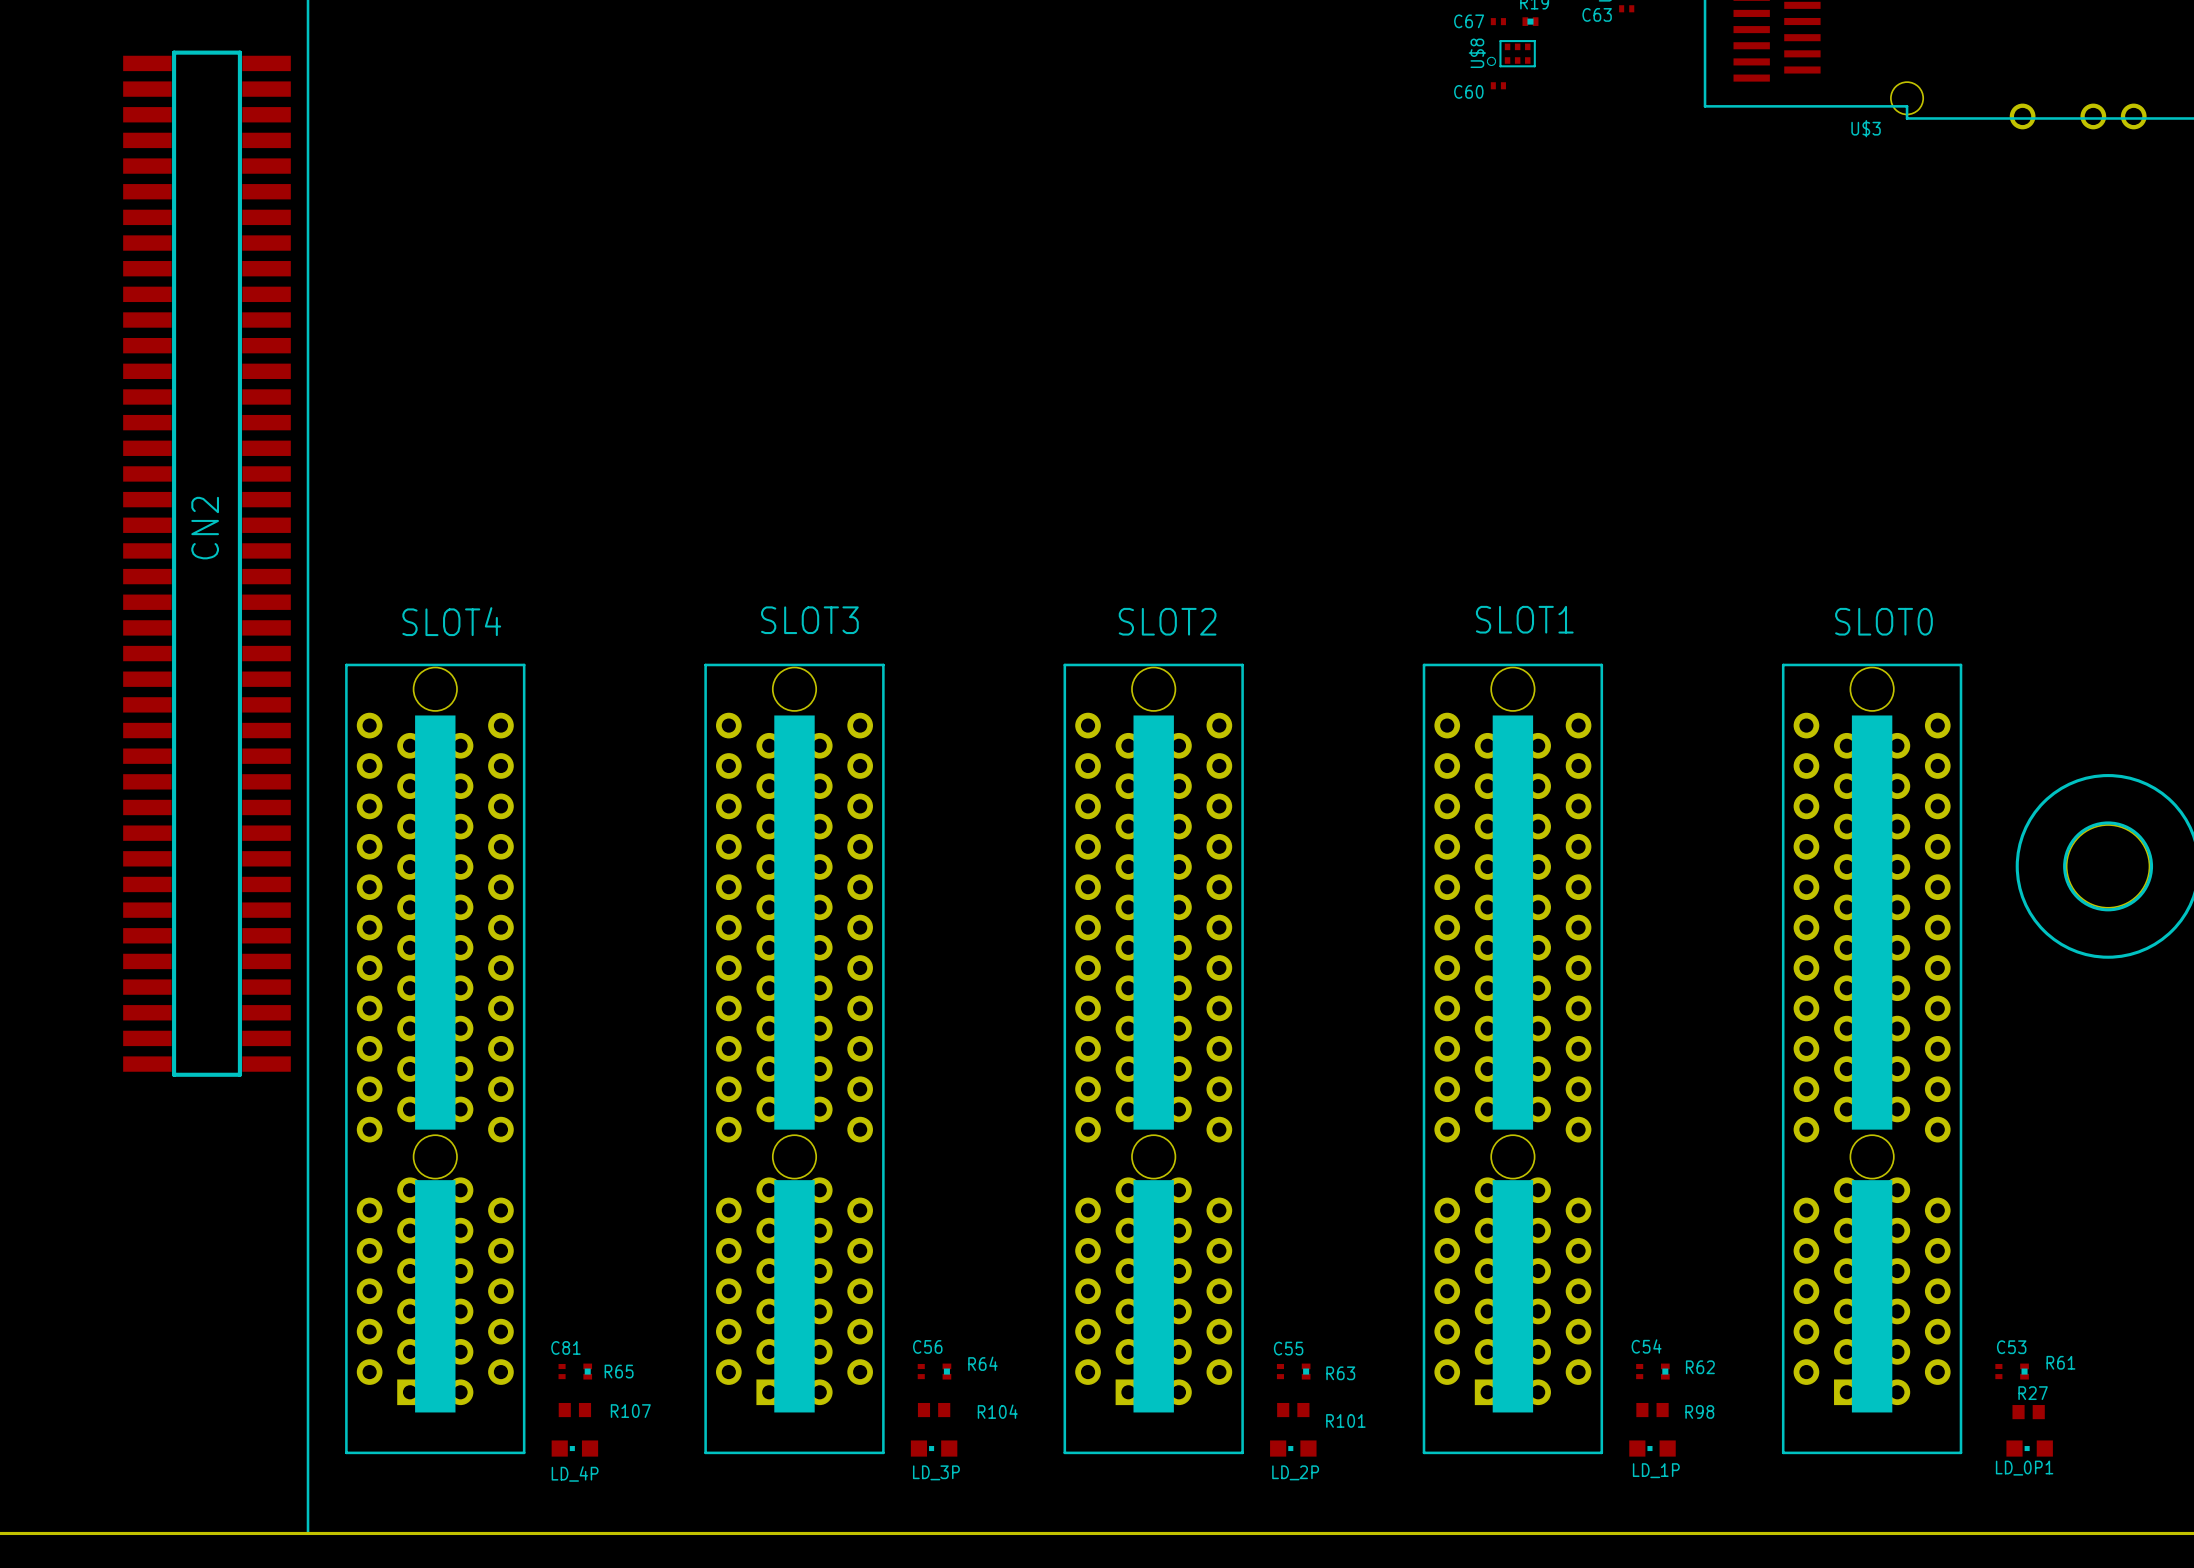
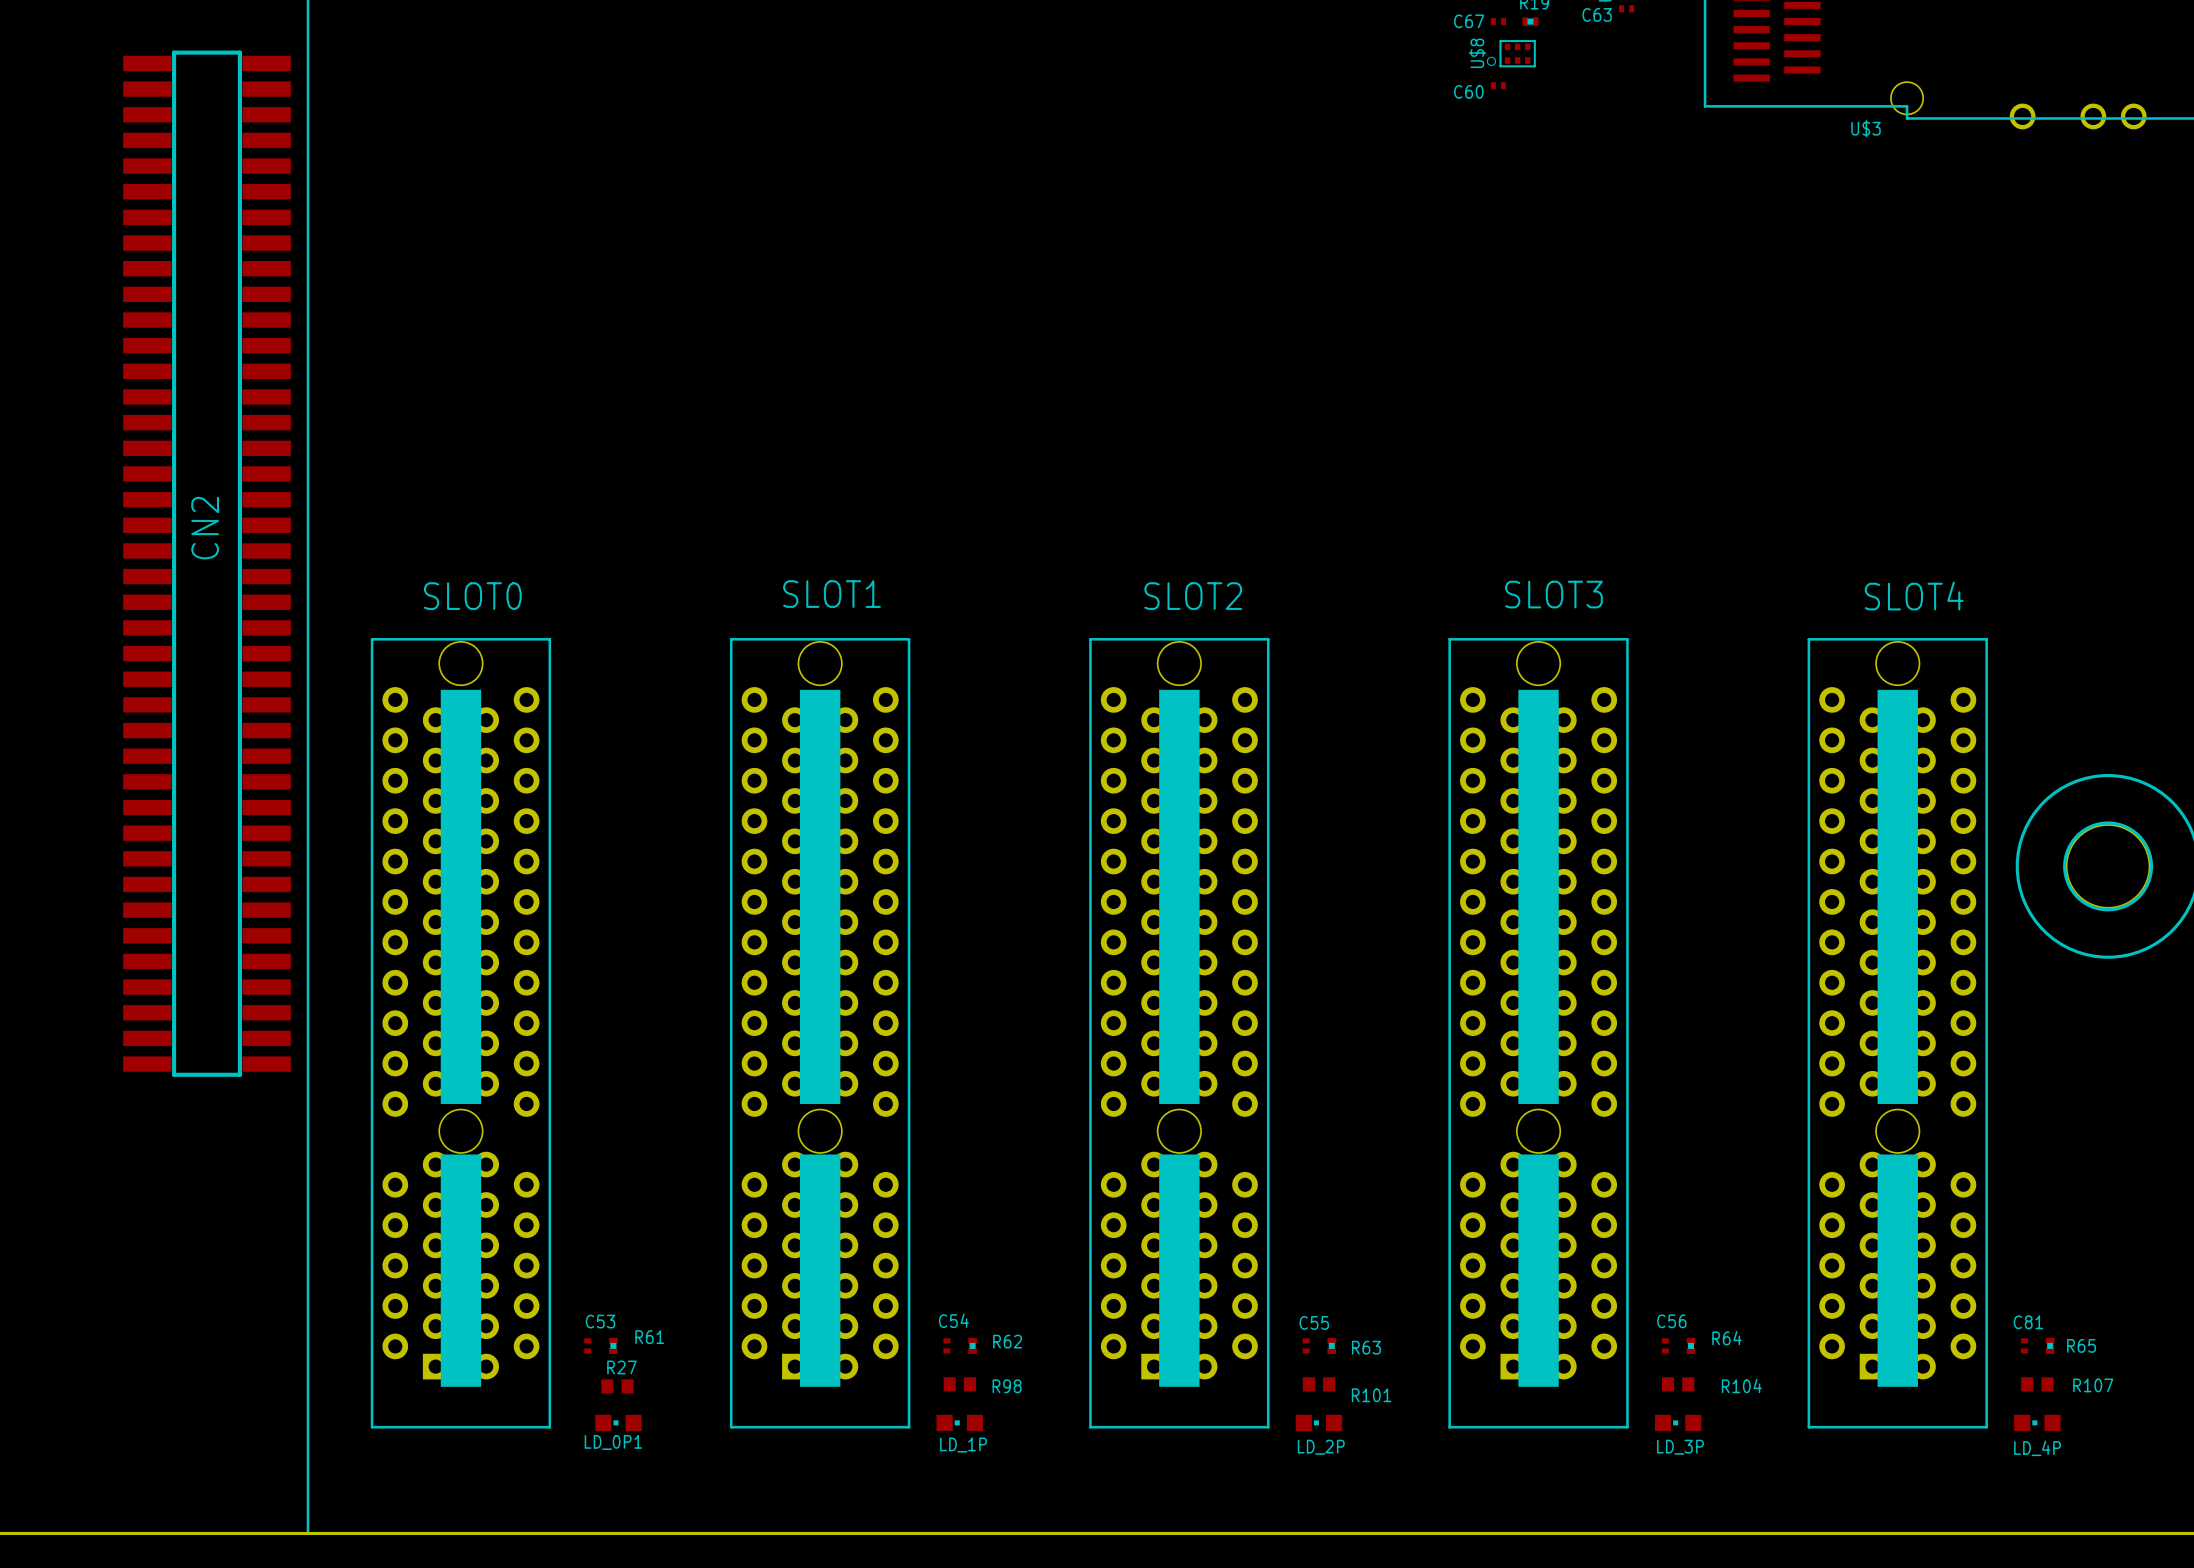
SLOT4 position: (435, 1058) -> (1897, 1033)
SLOT3 position: (794, 1058) -> (1538, 1033)
SLOT2 position: (1153, 1058) -> (1179, 1033)
SLOT1 position: (1512, 1058) -> (820, 1033)
SLOT0 position: (1872, 1058) -> (460, 1033)
C81 position: (562, 1371) -> (2024, 1345)
R65 position: (587, 1371) -> (2050, 1345)
C56 position: (921, 1371) -> (1665, 1345)
R64 position: (946, 1371) -> (1690, 1345)
C55 position: (1280, 1371) -> (1306, 1345)
R63 position: (1306, 1371) -> (1331, 1345)
C54 position: (1639, 1371) -> (946, 1345)
R62 position: (1665, 1371) -> (972, 1345)
C53 position: (1998, 1371) -> (587, 1345)
R61 position: (2024, 1371) -> (613, 1345)
R107 position: (574, 1410) -> (2037, 1384)
R104 position: (934, 1410) -> (1678, 1384)
R101 position: (1293, 1410) -> (1318, 1384)
R98 position: (1652, 1410) -> (959, 1384)
R27 position: (2028, 1412) -> (617, 1386)
LD_4P position: (574, 1448) -> (2037, 1422)
LD_3P position: (934, 1448) -> (1678, 1422)
LD_2P position: (1293, 1448) -> (1318, 1422)
LD_1P position: (1652, 1448) -> (959, 1422)
LD_0P1 position: (2029, 1448) -> (618, 1422)

